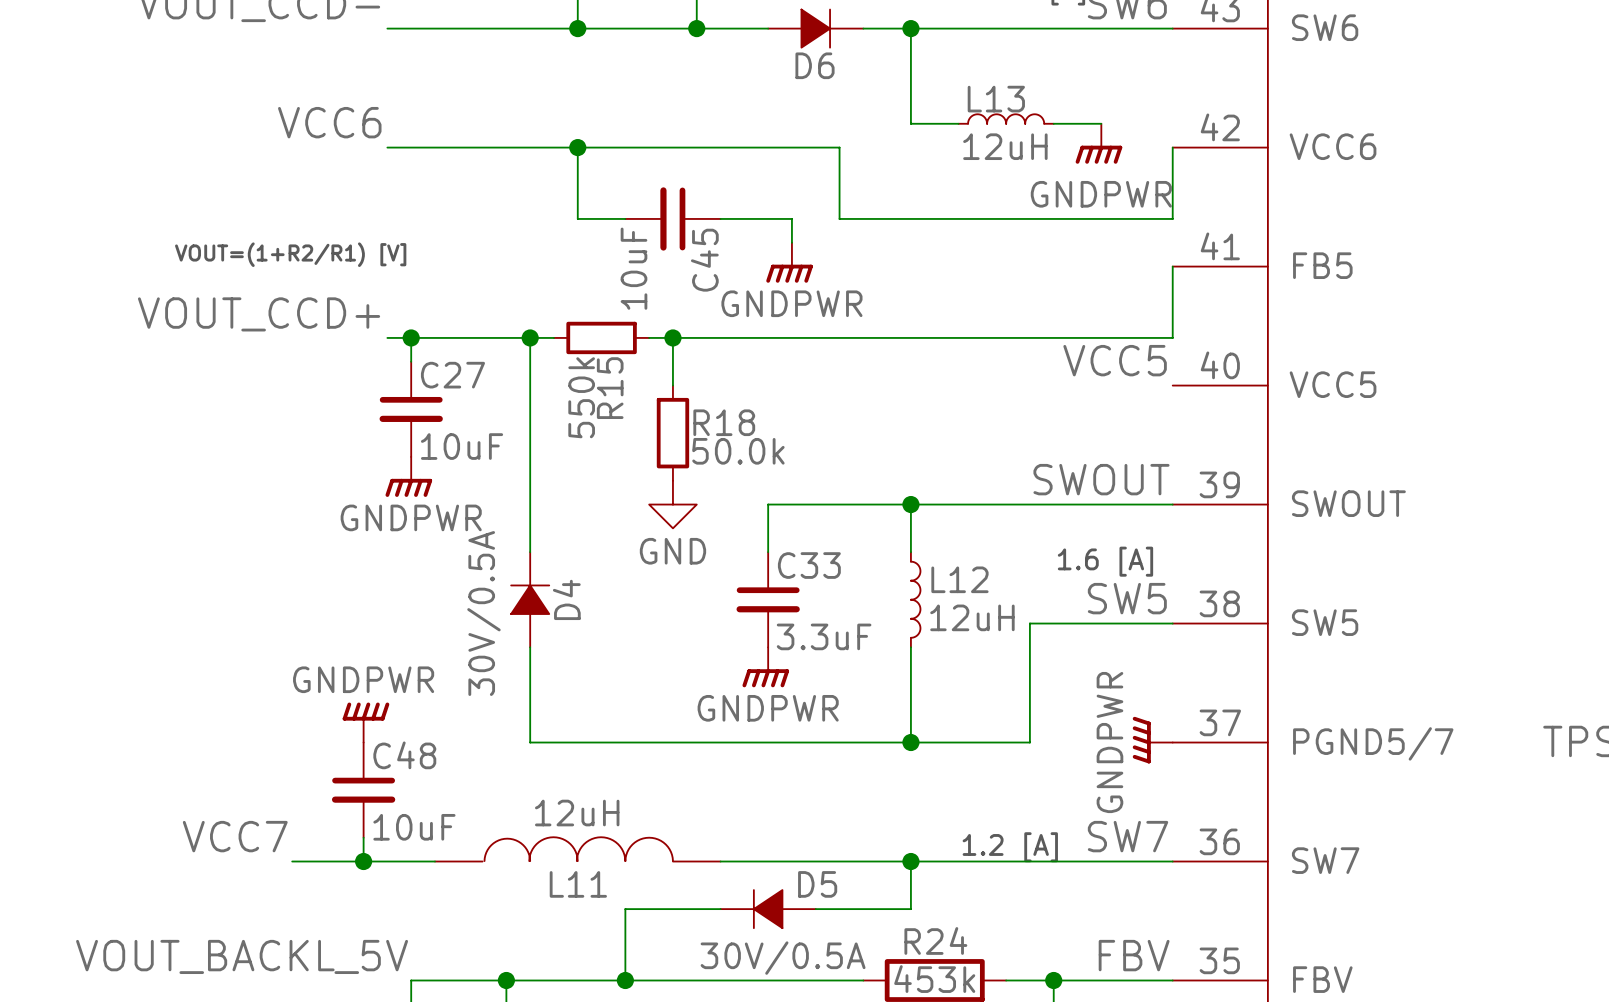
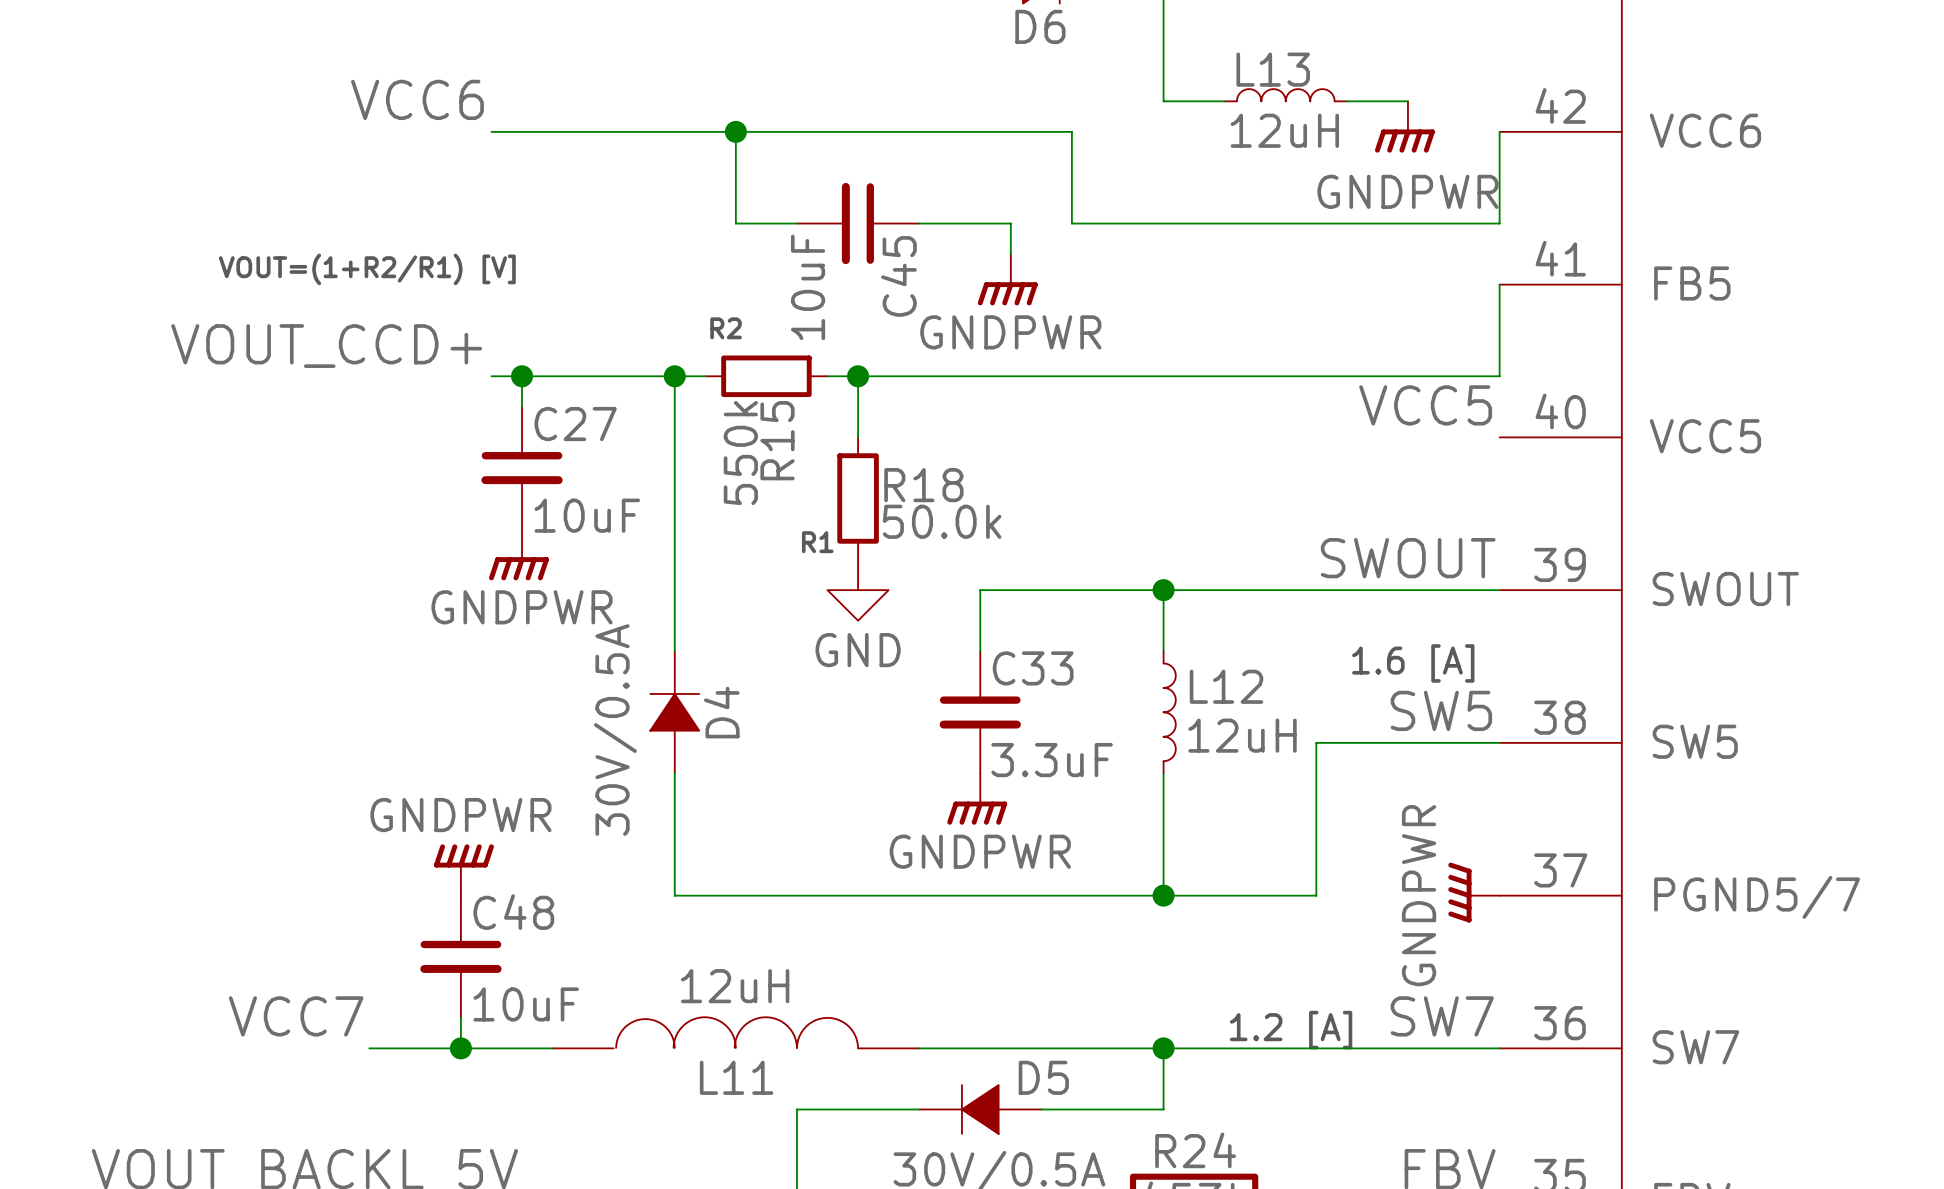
text: none -> R2 (726, 328)
text: none -> R1 (817, 542)

